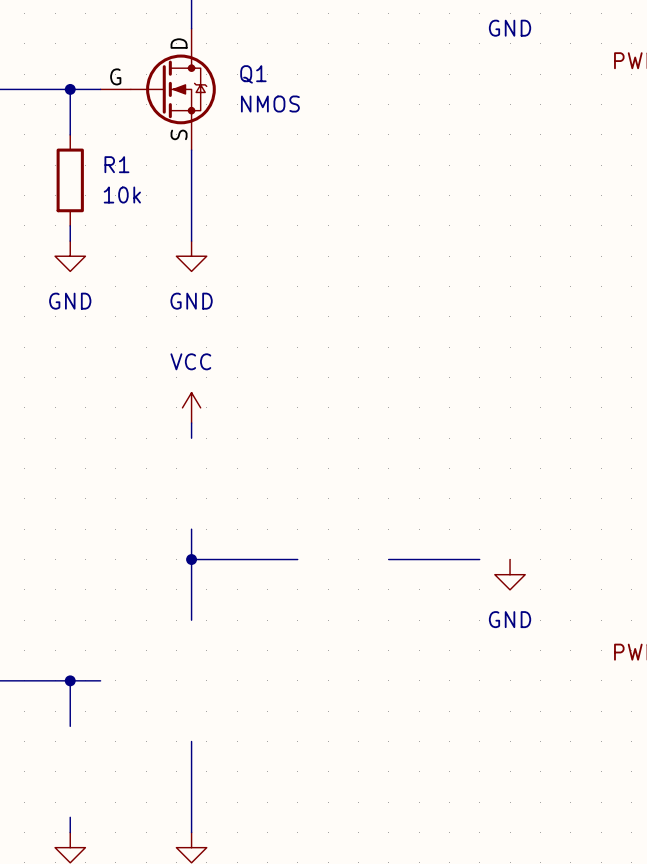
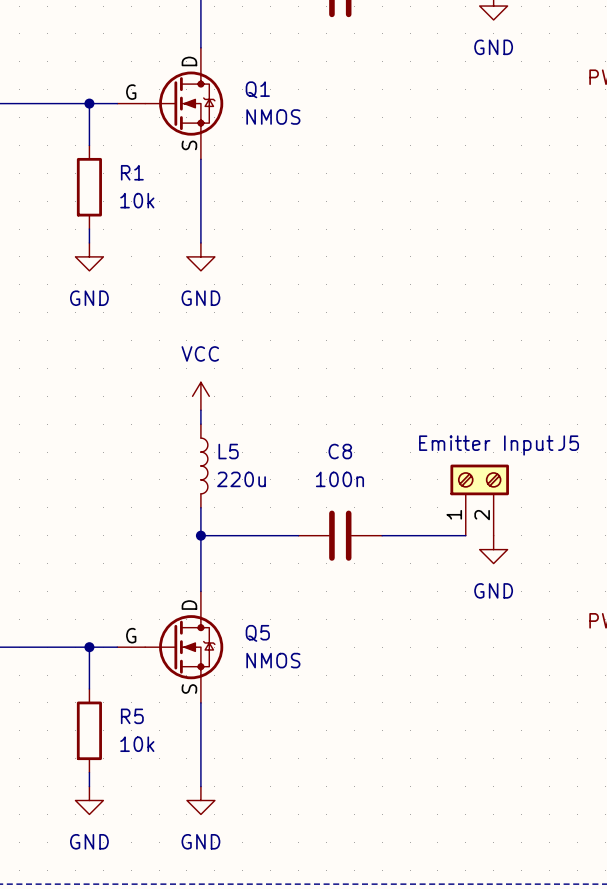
L5: none -> 220u (204, 465)
J5: none -> Emitter Input (479, 500)
C8: none -> 100n (340, 535)
Q5: none -> NMOS (170, 647)
R5: none -> 10k (89, 730)

